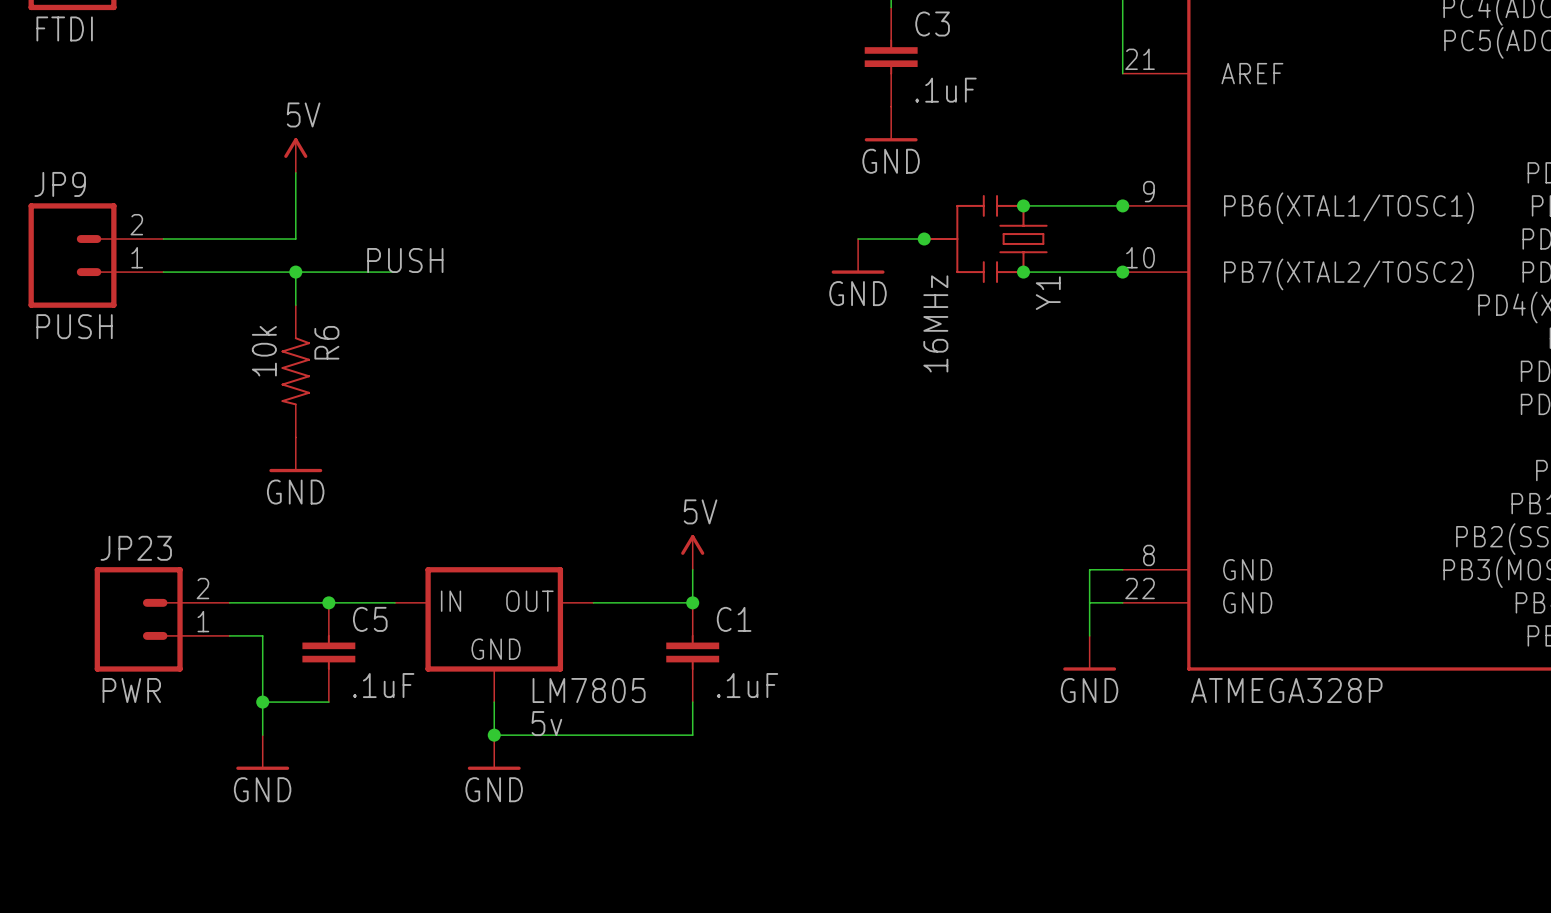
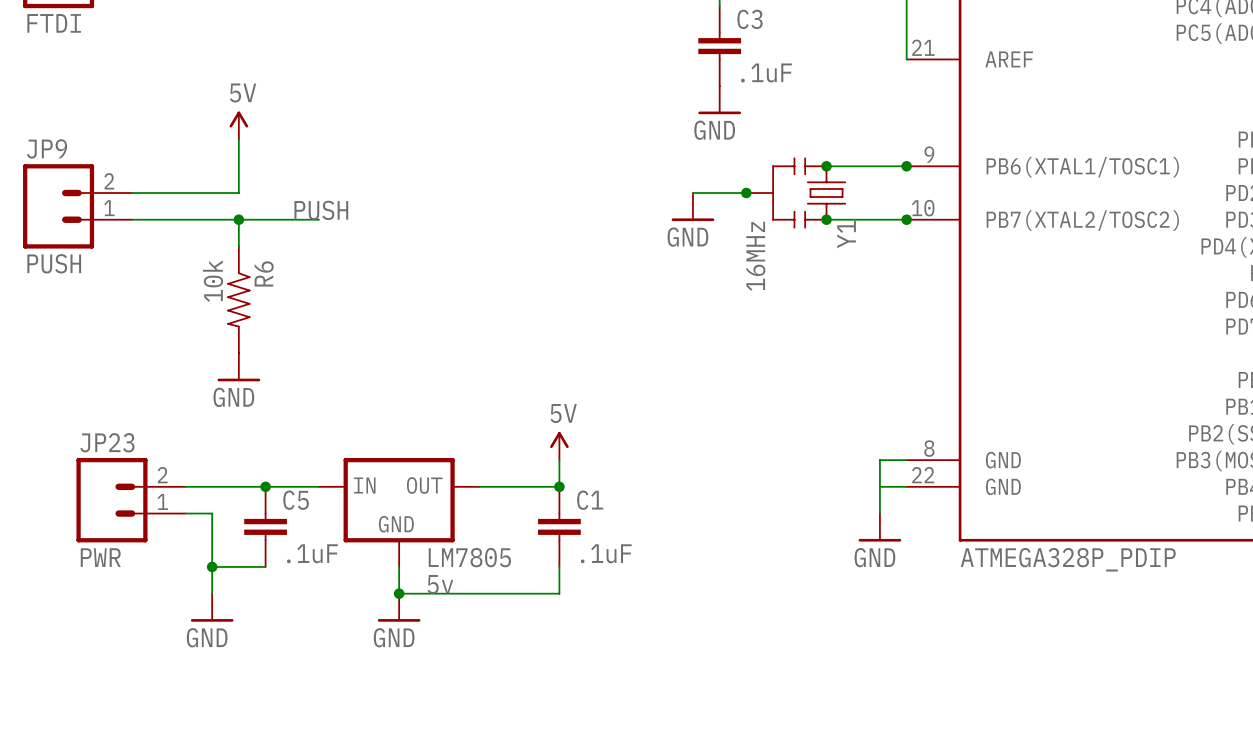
part value: ATMEGA328P (1286, 690) -> ATMEGA328P_PDIP (1068, 559)

